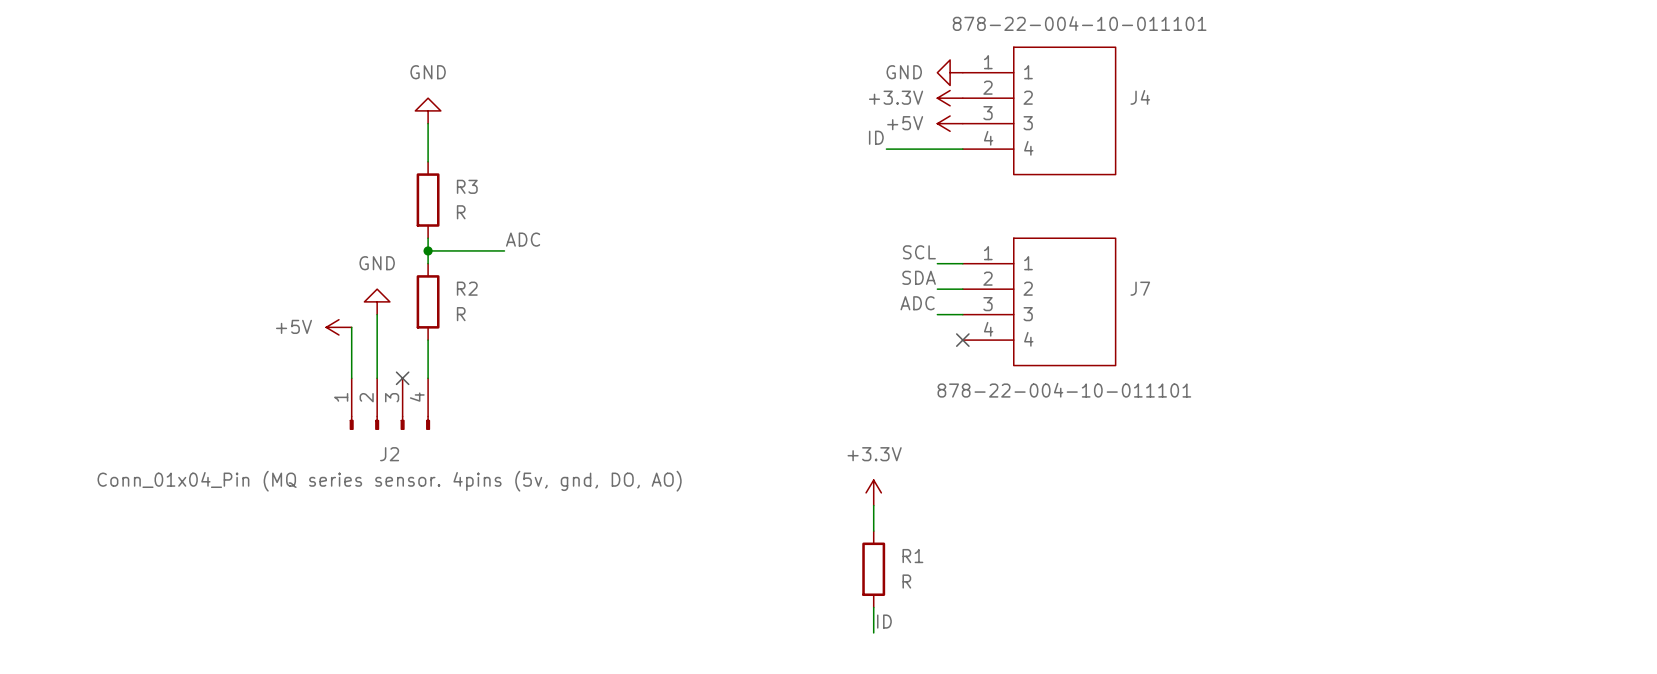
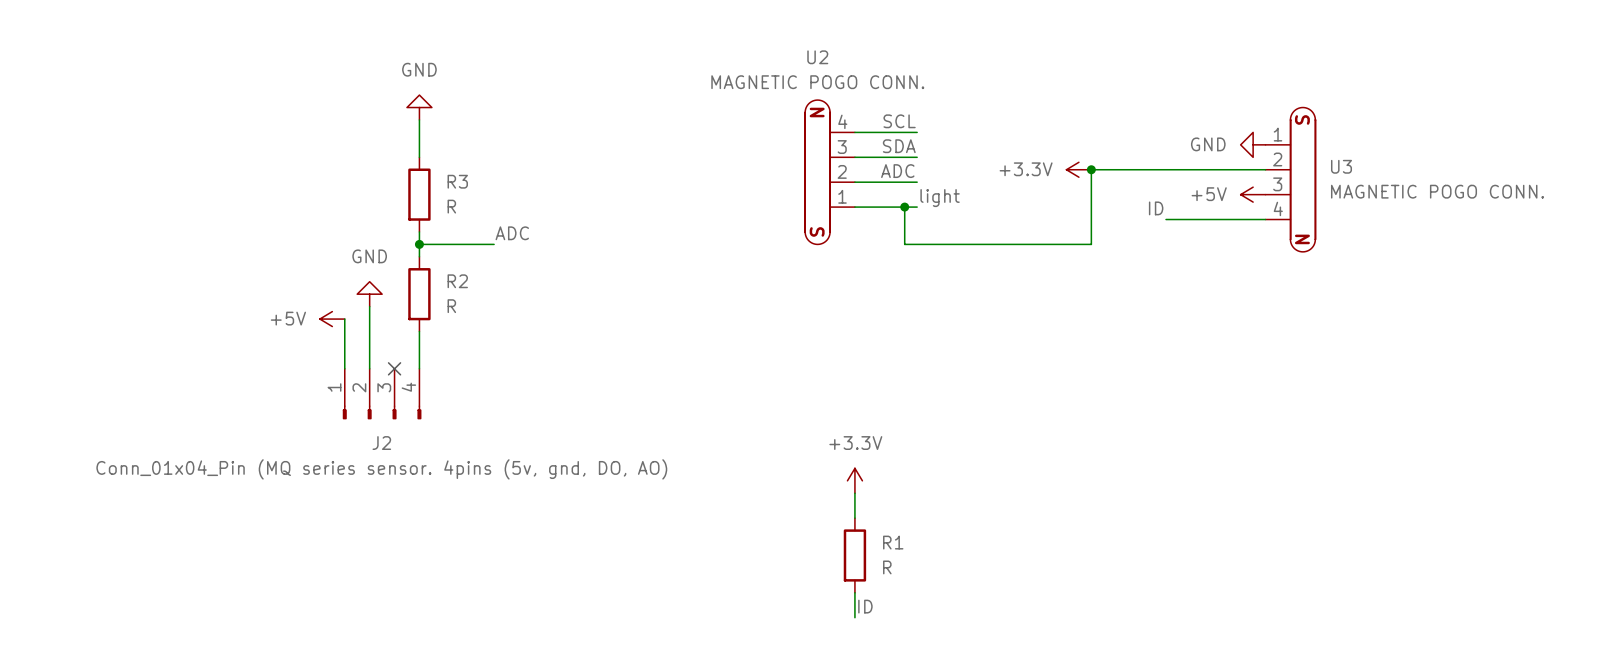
power symbol: GND (950, 72) -> none
power symbol position: +3.3V (950, 98) -> +3.3V (1078, 169)
J4: 878-22-004-10-011101 (1039, 110) -> none
power symbol: +5V (950, 123) -> none
wire: none -> (854, 132) (917, 132)
label: ID (876, 137) -> none
wire: (886, 149) (962, 149) -> none
power symbol: none -> GND (1253, 144)
wire: none -> (854, 157) (917, 157)
junction: none -> (1091, 169)
wire: none -> (1265, 169) (1091, 169) (1091, 244) (904, 244) (904, 207)
U2: none -> MAGNETIC POGO CONN. (829, 172)
U3: none -> MAGNETIC POGO CONN. (1290, 179)
wire: none -> (854, 182) (917, 182)
power symbol: none -> +5V (1253, 194)
label: none -> light (940, 198)
wire: none -> (854, 207) (917, 207)
junction: none -> (904, 207)
label: none -> ID (1156, 208)
wire: none -> (1166, 219) (1265, 219)
label position: SCL (919, 252) -> SCL (899, 121)
wire: (937, 263) (962, 263) -> none
label position: SDA (919, 277) -> SDA (899, 146)
wire: (937, 289) (962, 289) -> none
J7: 878-22-004-10-011101 (1039, 301) -> none
label position: ADC (917, 303) -> ADC (897, 171)
wire: (937, 314) (962, 314) -> none
no-connect mark: (962, 340) -> none

